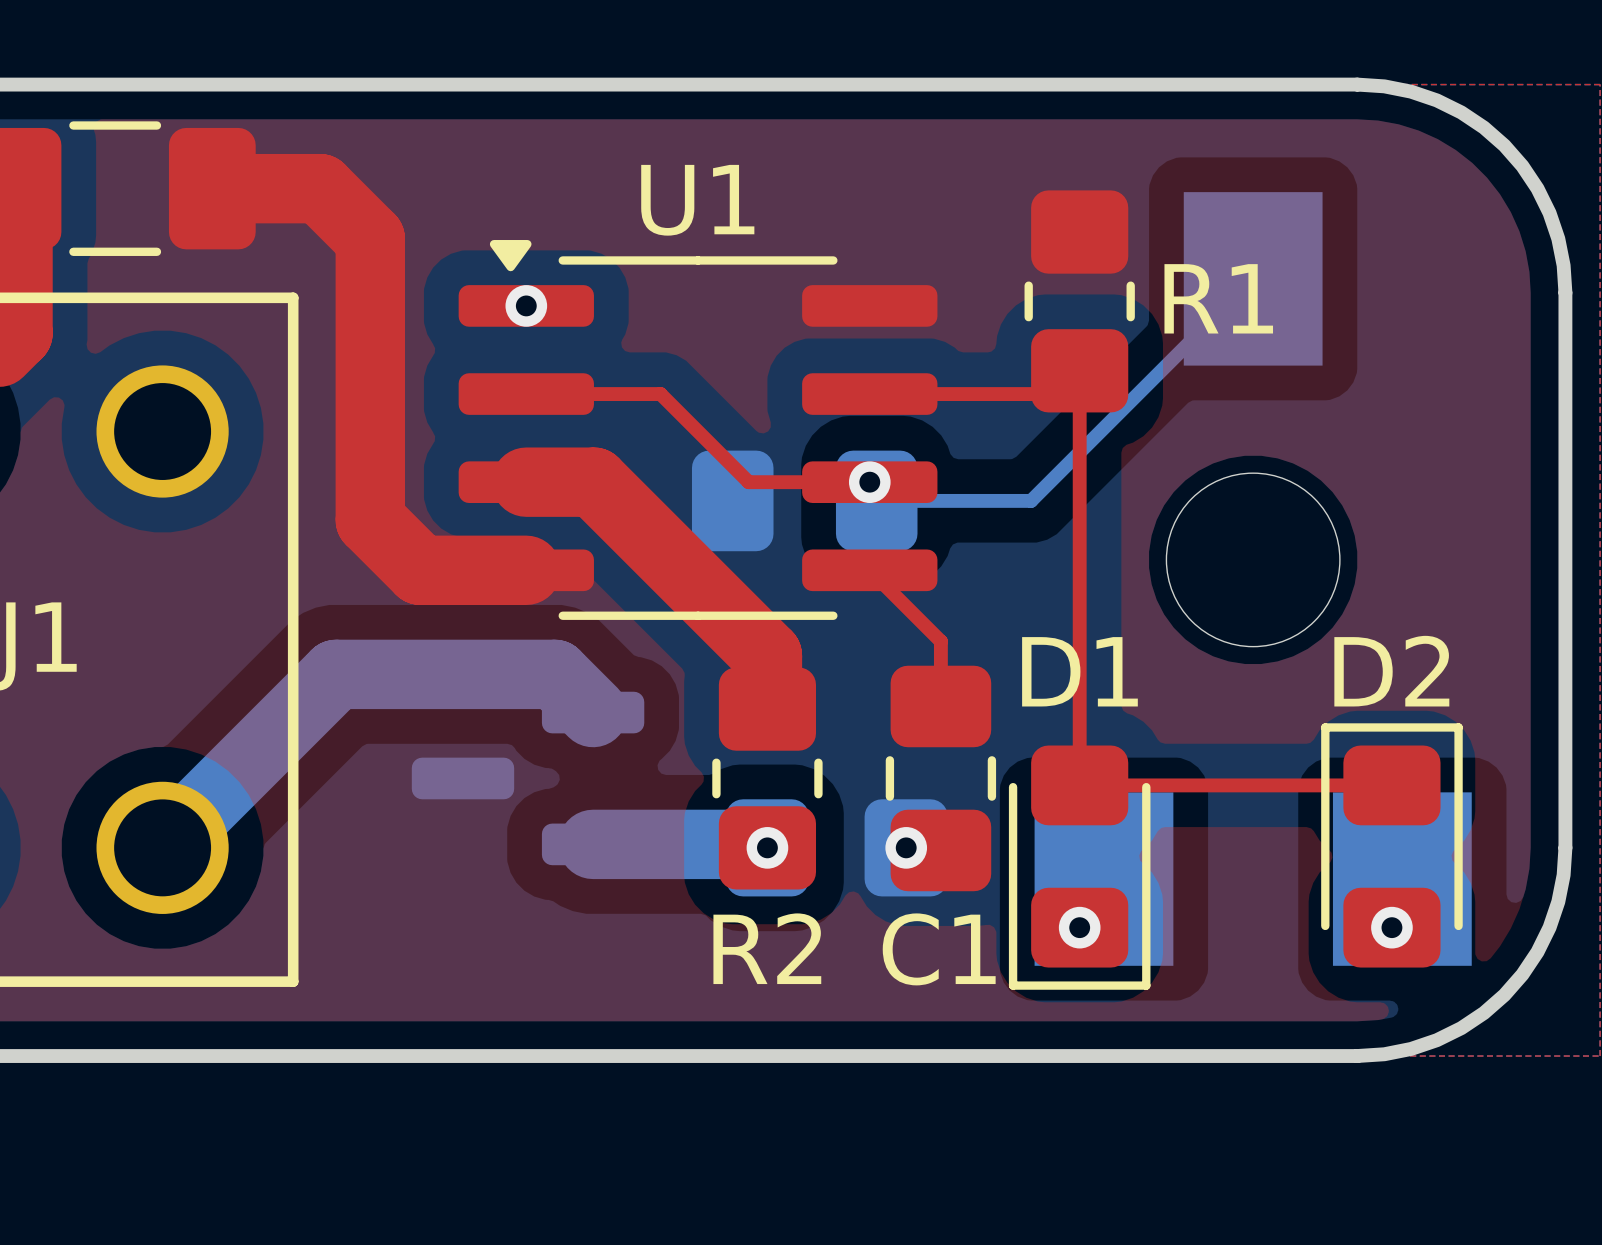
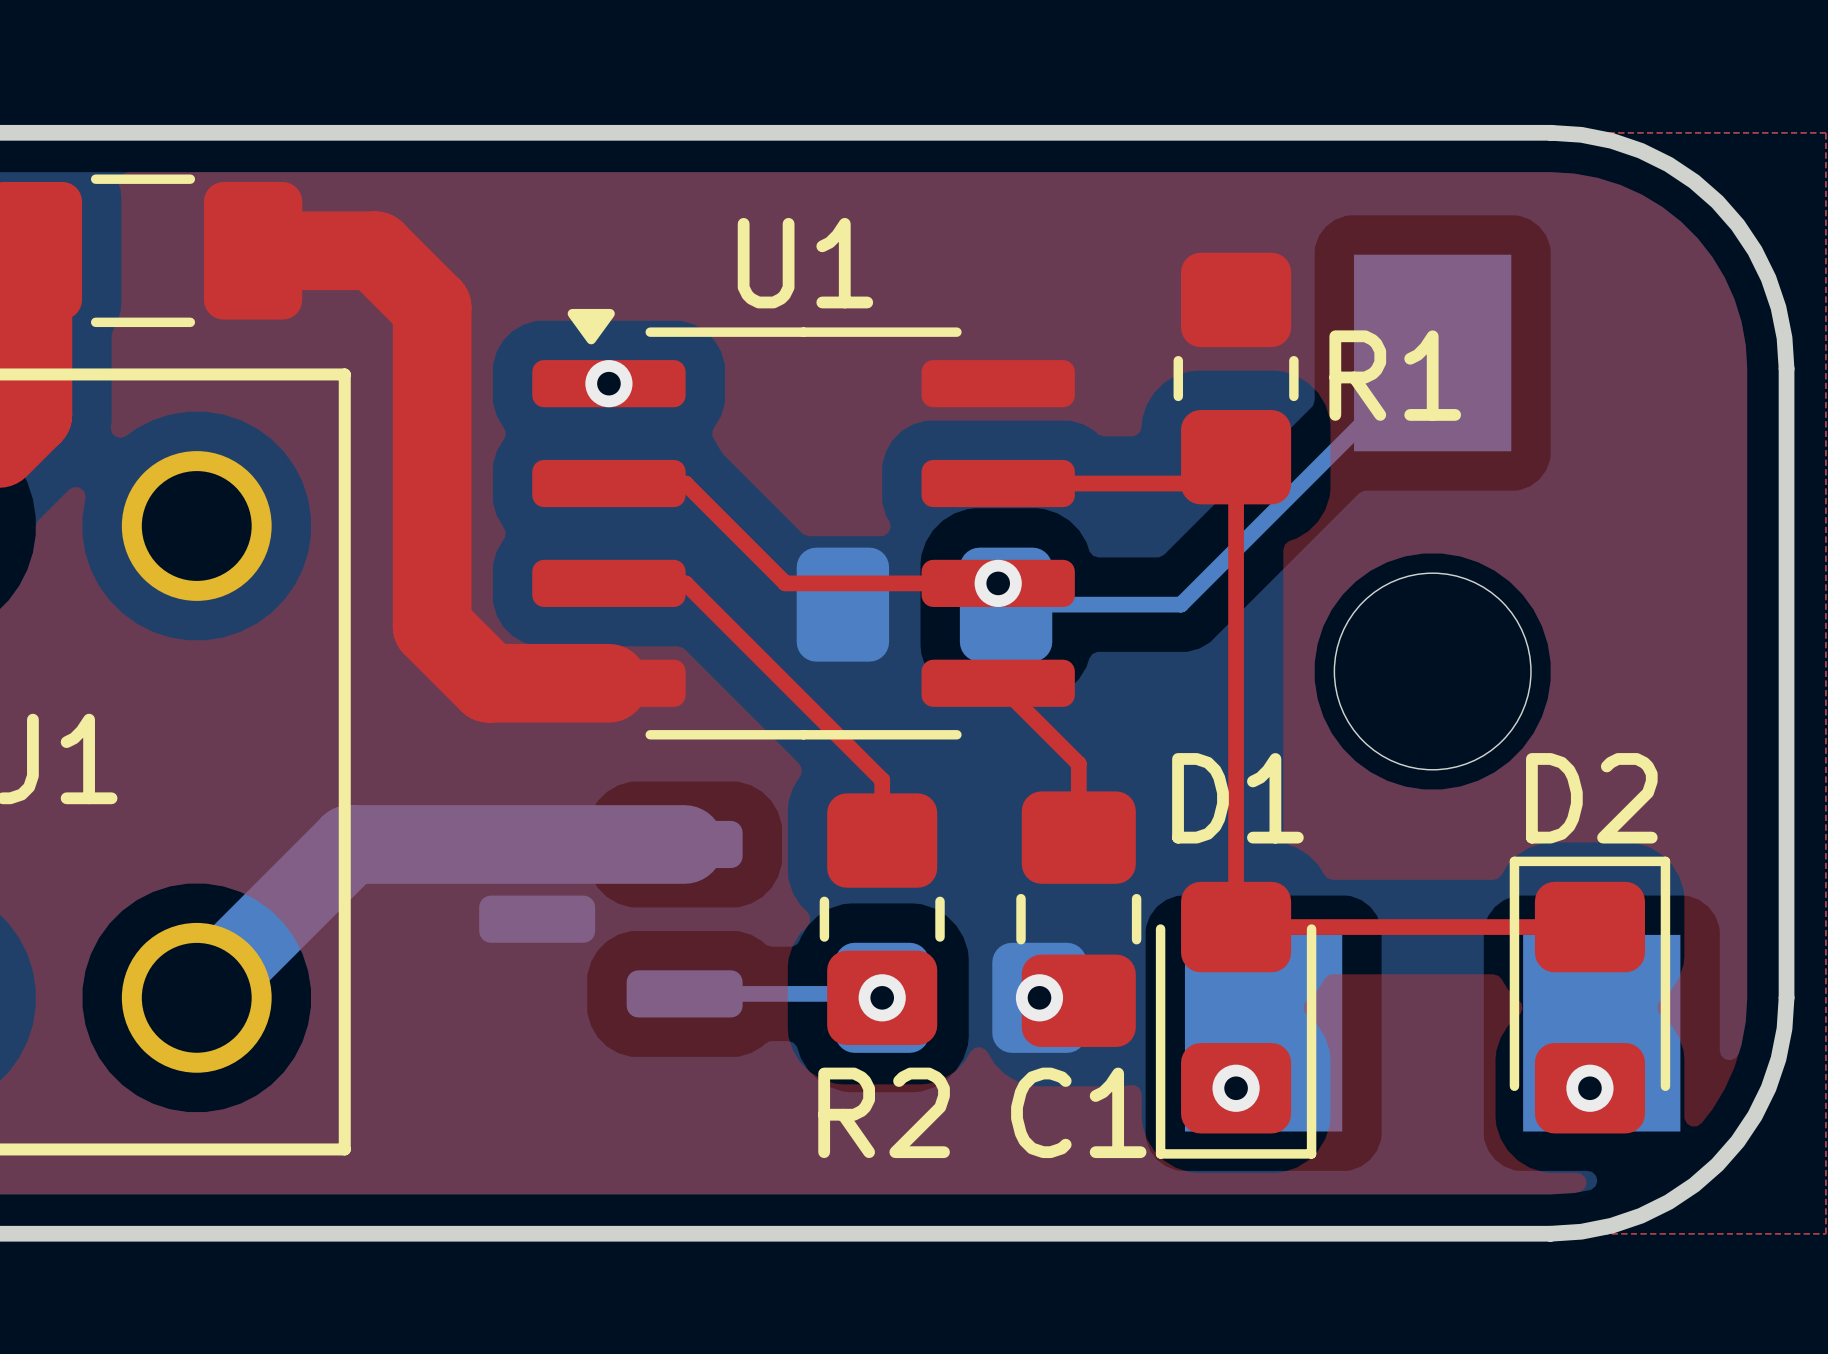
top track: (593, 394) (660, 394) (748, 482) -> (685, 483) (785, 583) (860, 583)
top track width: thick (526, 482) (593, 482) (767, 655) (767, 709) -> thin (608, 583) (685, 583) (882, 780) (882, 840)
bottom track: (297, 712) (336, 674) (554, 674) (593, 712) -> (350, 844) (684, 844)
bottom track width: thick (593, 844) (763, 844) -> thin (684, 993) (878, 993)

